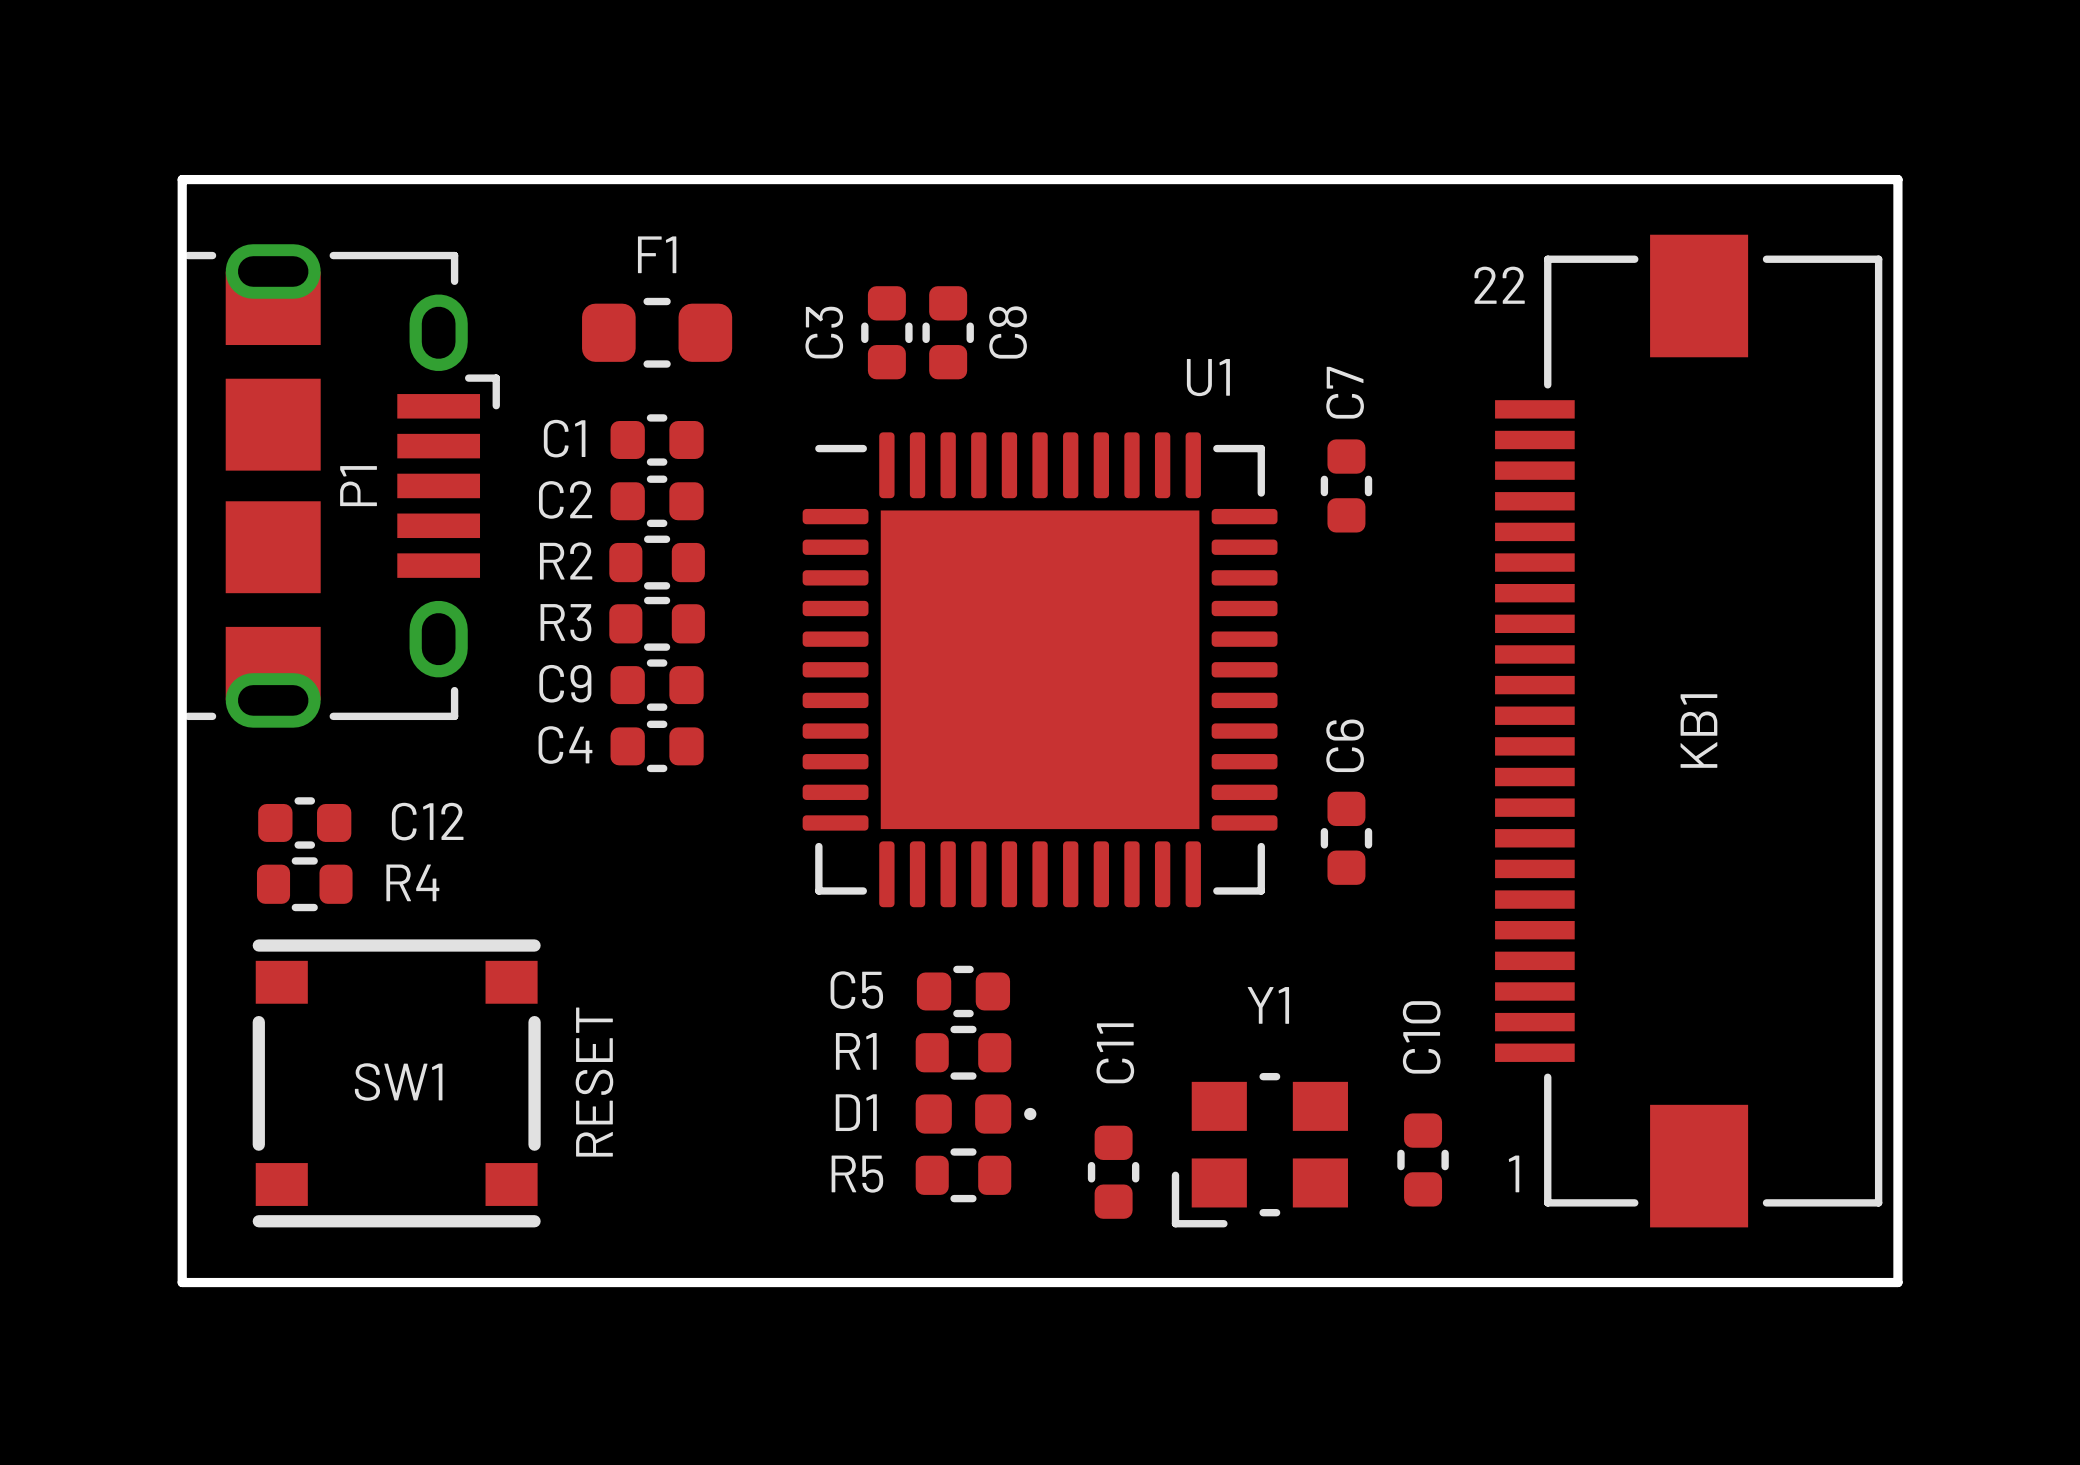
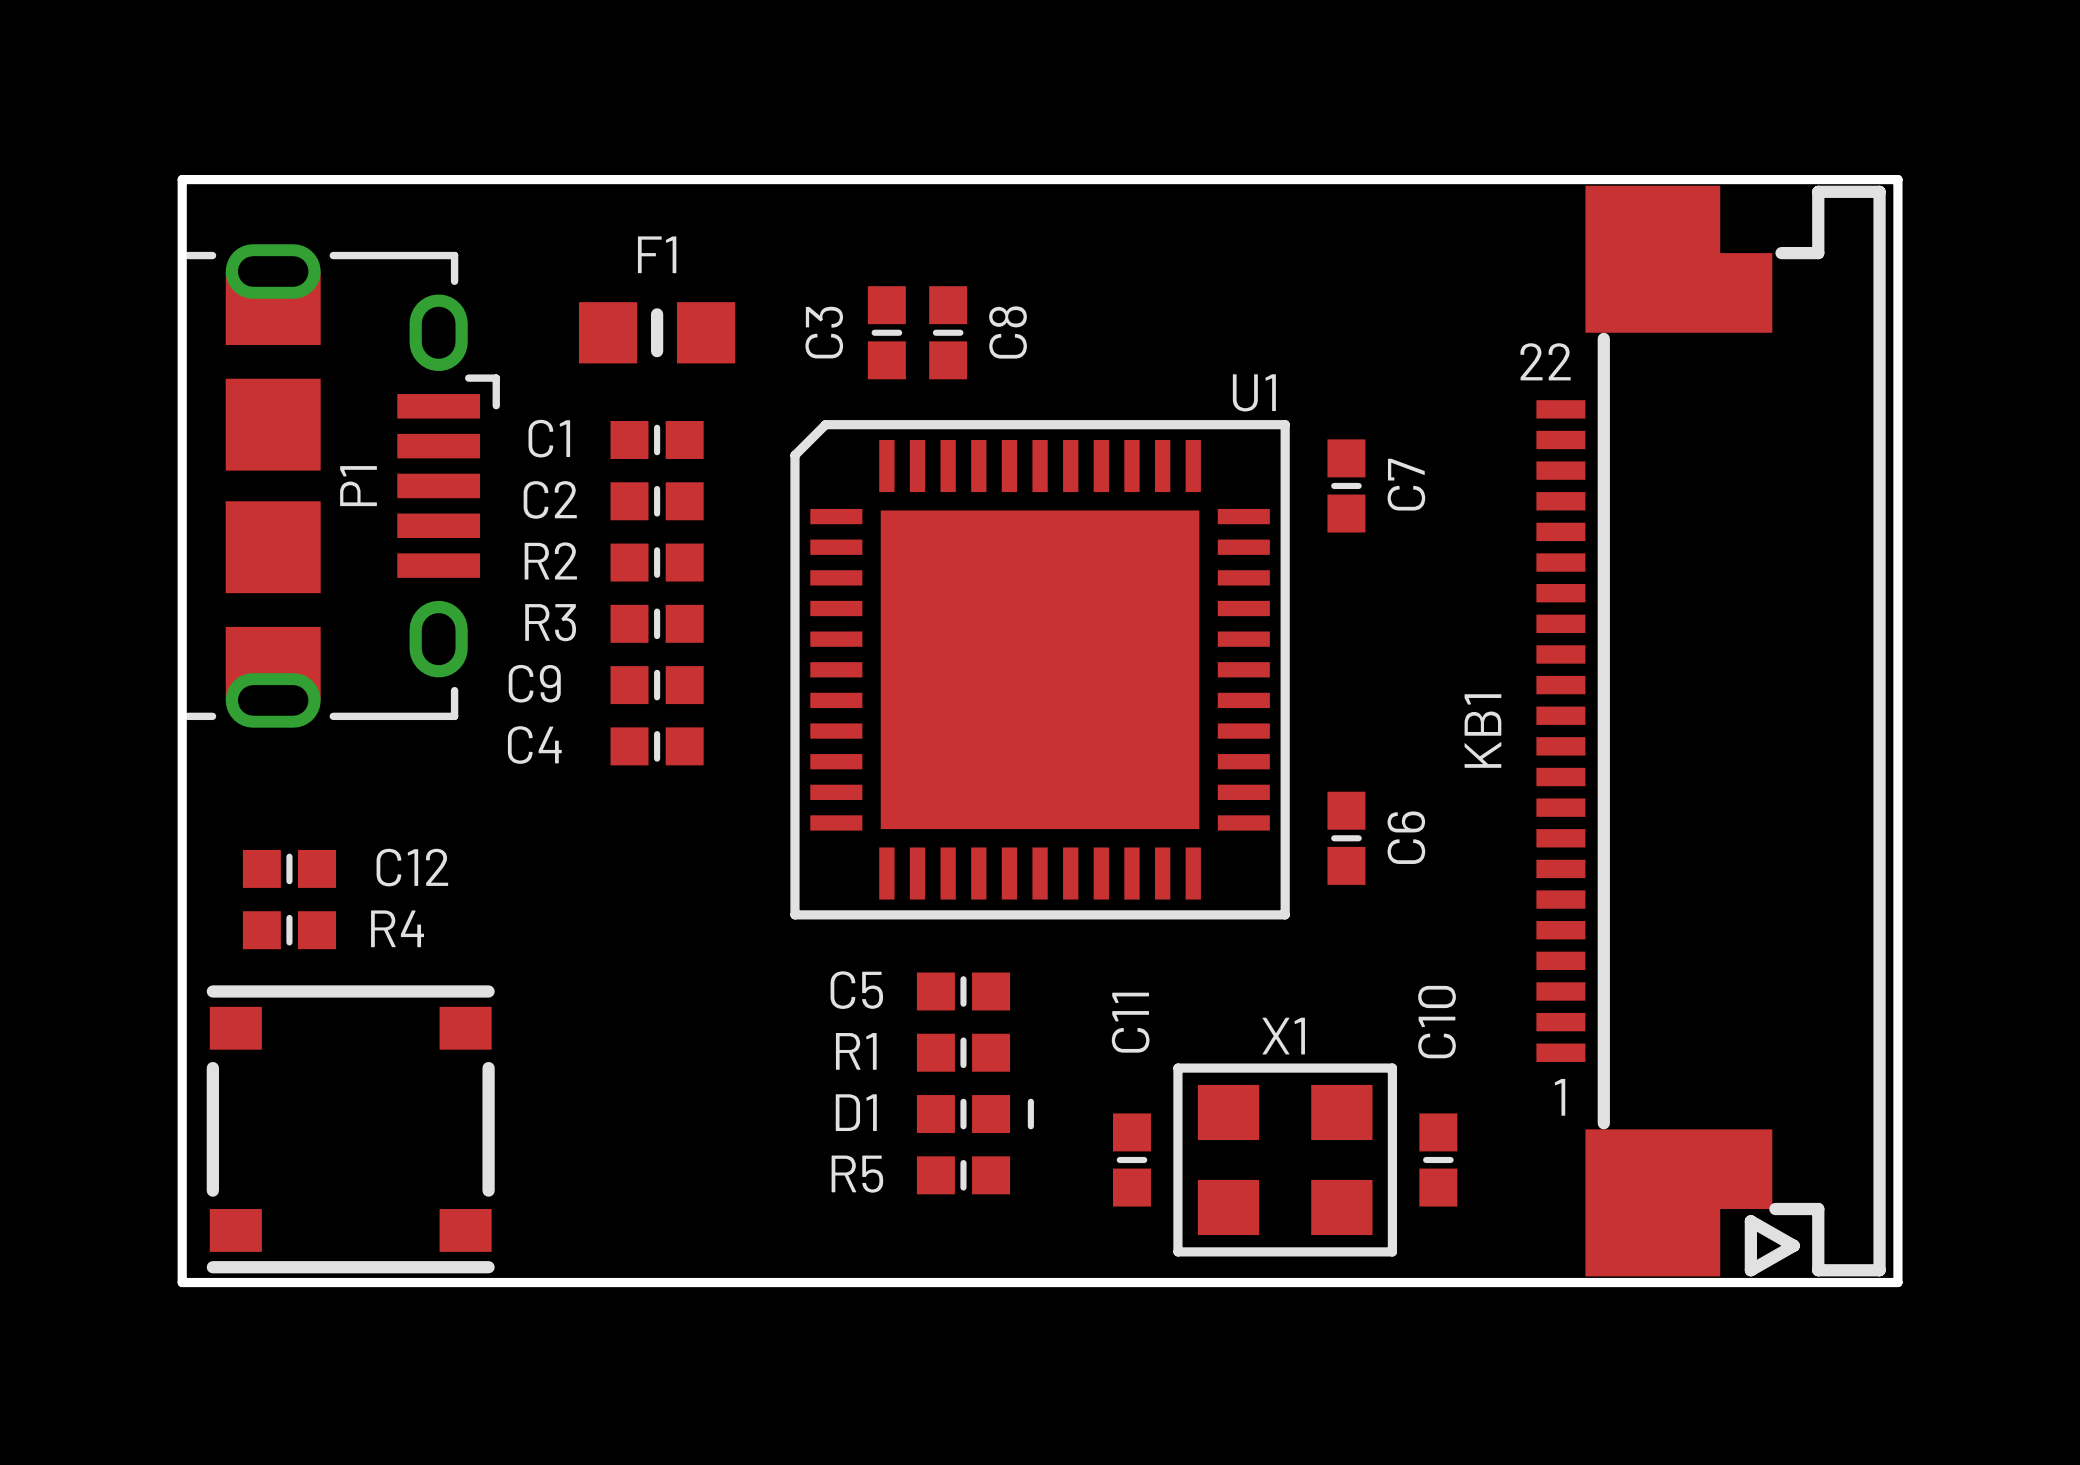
KB1 footprint: [1495, 234, 1883, 1228] -> [1536, 185, 1886, 1277]
text position: 22 (1499, 285) -> 22 (1545, 361)
C3 footprint: [861, 286, 913, 380] -> [867, 286, 906, 380]
C8 footprint: [922, 286, 974, 380] -> [929, 286, 968, 380]
F1 footprint: [582, 297, 733, 368] -> [578, 302, 736, 364]
C7 name position: C7 (1345, 392) -> C7 (1406, 484)
C1 footprint: [610, 414, 704, 466] -> [610, 421, 704, 459]
U1 footprint: [802, 432, 1278, 908] -> [790, 420, 1290, 920]
C1 name position: C1 (564, 438) -> C1 (549, 438)
C7 footprint: [1320, 439, 1373, 533] -> [1327, 439, 1366, 533]
C2 footprint: [610, 475, 704, 528] -> [610, 482, 704, 521]
C2 name position: C2 (565, 499) -> C2 (550, 499)
R2 footprint: [609, 535, 705, 590] -> [610, 543, 704, 582]
R2 name position: R2 (566, 560) -> R2 (550, 560)
R3 footprint: [609, 596, 705, 651] -> [610, 604, 704, 643]
R3 name position: R3 (565, 622) -> R3 (550, 622)
C9 footprint: [610, 659, 704, 711] -> [610, 666, 704, 705]
C9 name position: C9 (565, 683) -> C9 (534, 683)
C4 footprint: [610, 720, 704, 773] -> [610, 727, 704, 766]
KB1 name position: KB1 (1698, 731) -> KB1 (1482, 731)
C4 name position: C4 (565, 745) -> C4 (534, 745)
C6 name position: C6 (1345, 745) -> C6 (1406, 837)
C6 footprint: [1320, 791, 1373, 885] -> [1327, 791, 1366, 885]
C12 footprint: [258, 797, 352, 849] -> [242, 849, 337, 888]
C12 name position: C12 (427, 821) -> C12 (412, 867)
R4 footprint: [256, 857, 353, 912] -> [242, 911, 337, 950]
C5 footprint: [916, 965, 1011, 1018] -> [916, 972, 1011, 1011]
R1 footprint: [915, 1025, 1012, 1080] -> [916, 1033, 1011, 1072]
C10 name position: C10 (1421, 1037) -> C10 (1437, 1022)
C11 name position: C11 (1115, 1053) -> C11 (1130, 1022)
SW1: RESET (396, 1083) -> none
D1 footprint: [915, 1094, 1037, 1134] -> [916, 1095, 1034, 1134]
C10 footprint: [1397, 1113, 1449, 1207] -> [1419, 1113, 1458, 1207]
C11 footprint: [1087, 1125, 1140, 1219] -> [1112, 1113, 1151, 1207]
part: none -> (350, 1129)
R5 footprint: [915, 1148, 1012, 1203] -> [916, 1156, 1011, 1195]
Y1: (1259, 1150) -> none
X1: none -> (1285, 1159)
text position: 1 (1514, 1173) -> 1 (1560, 1097)

